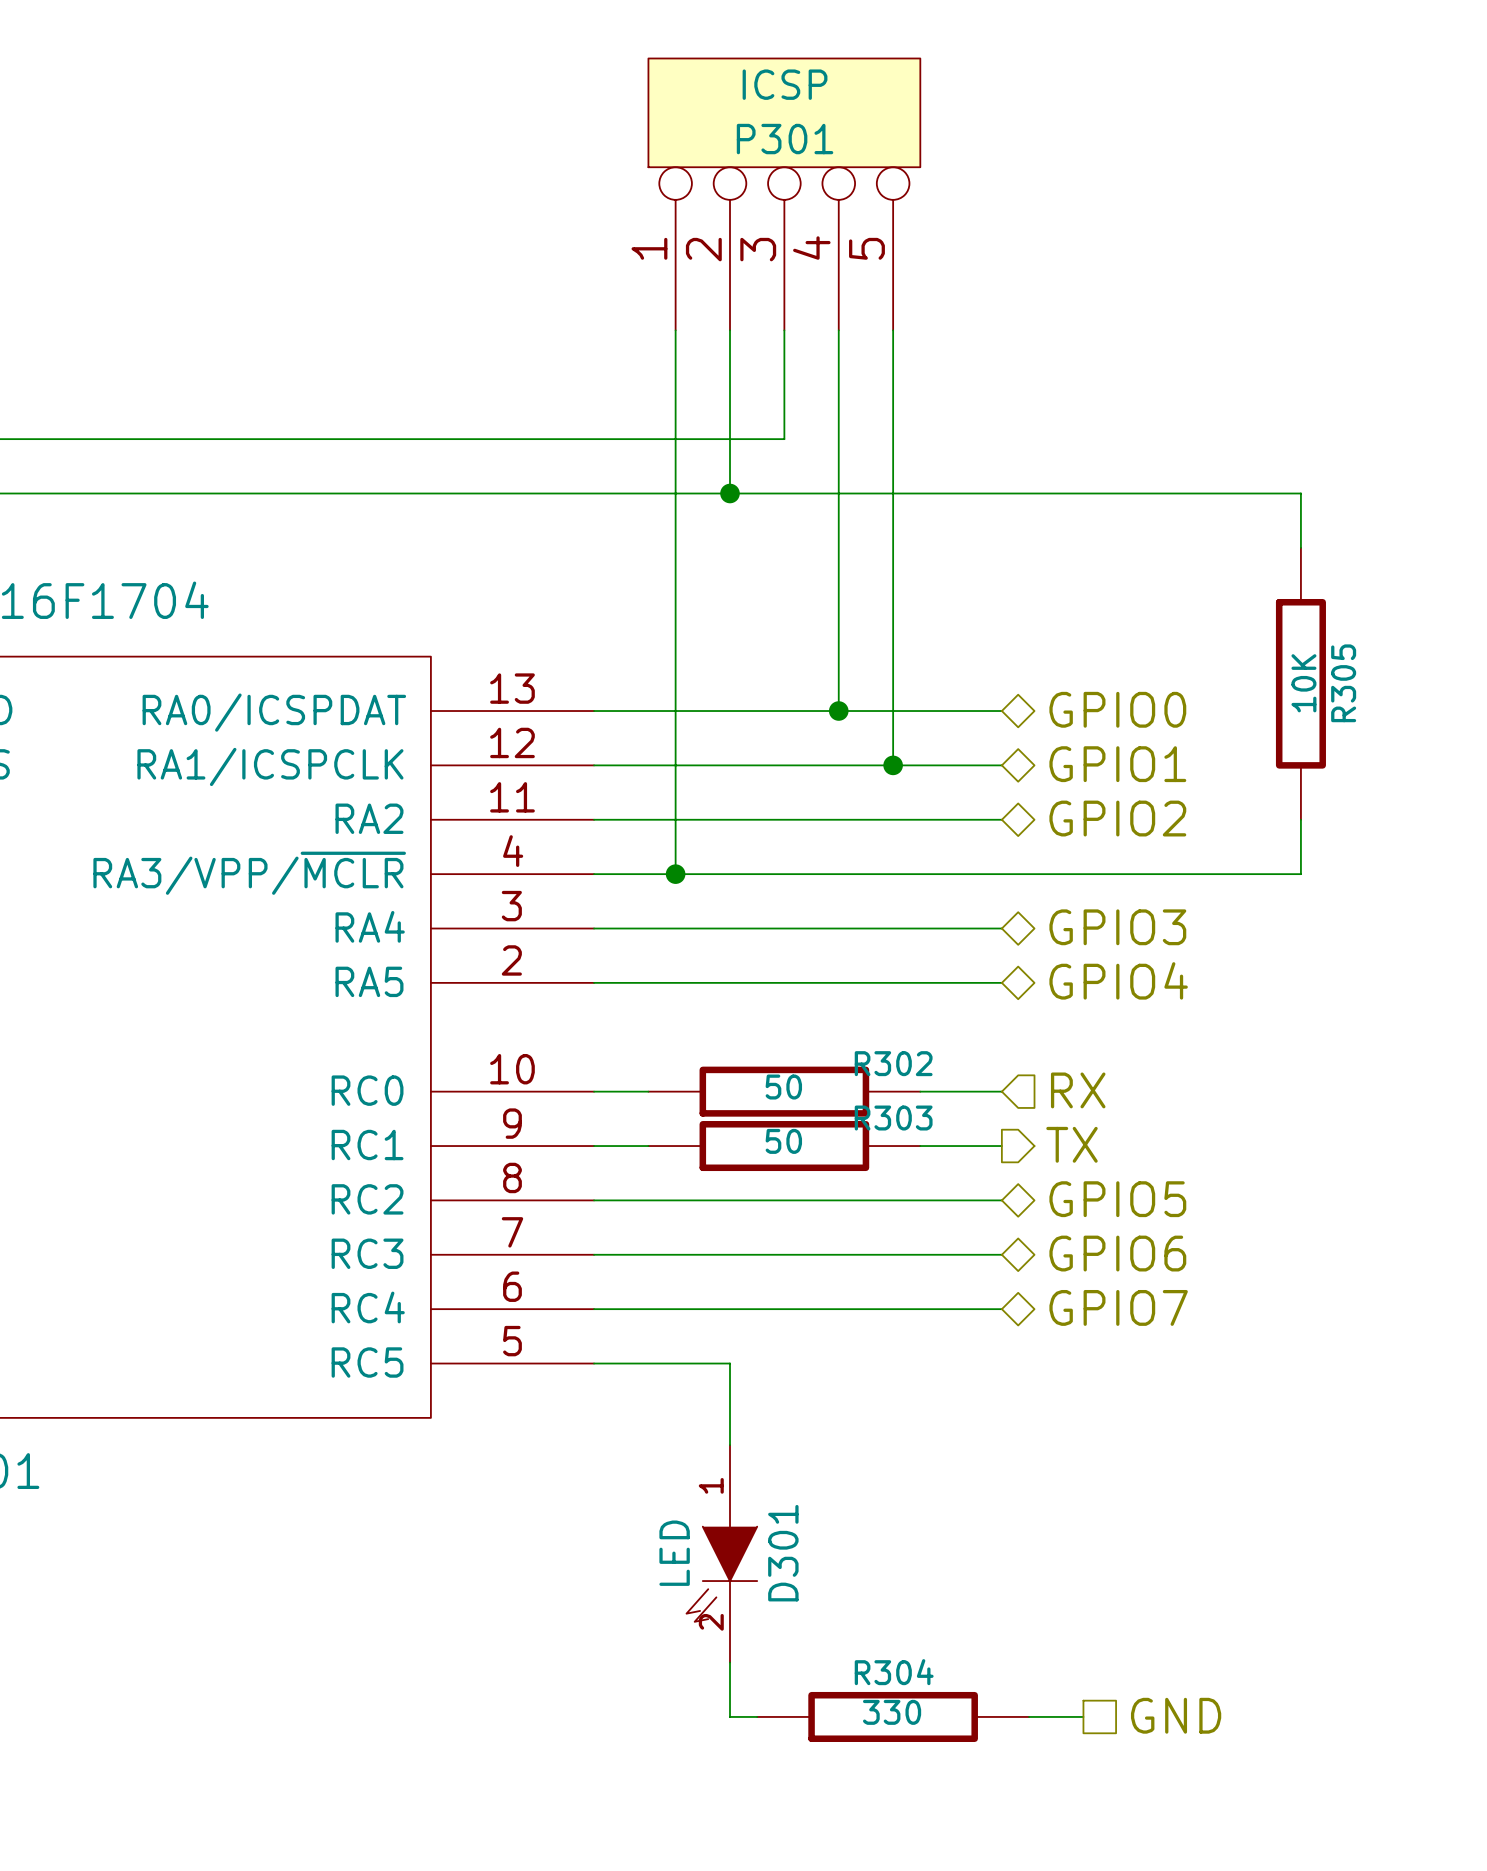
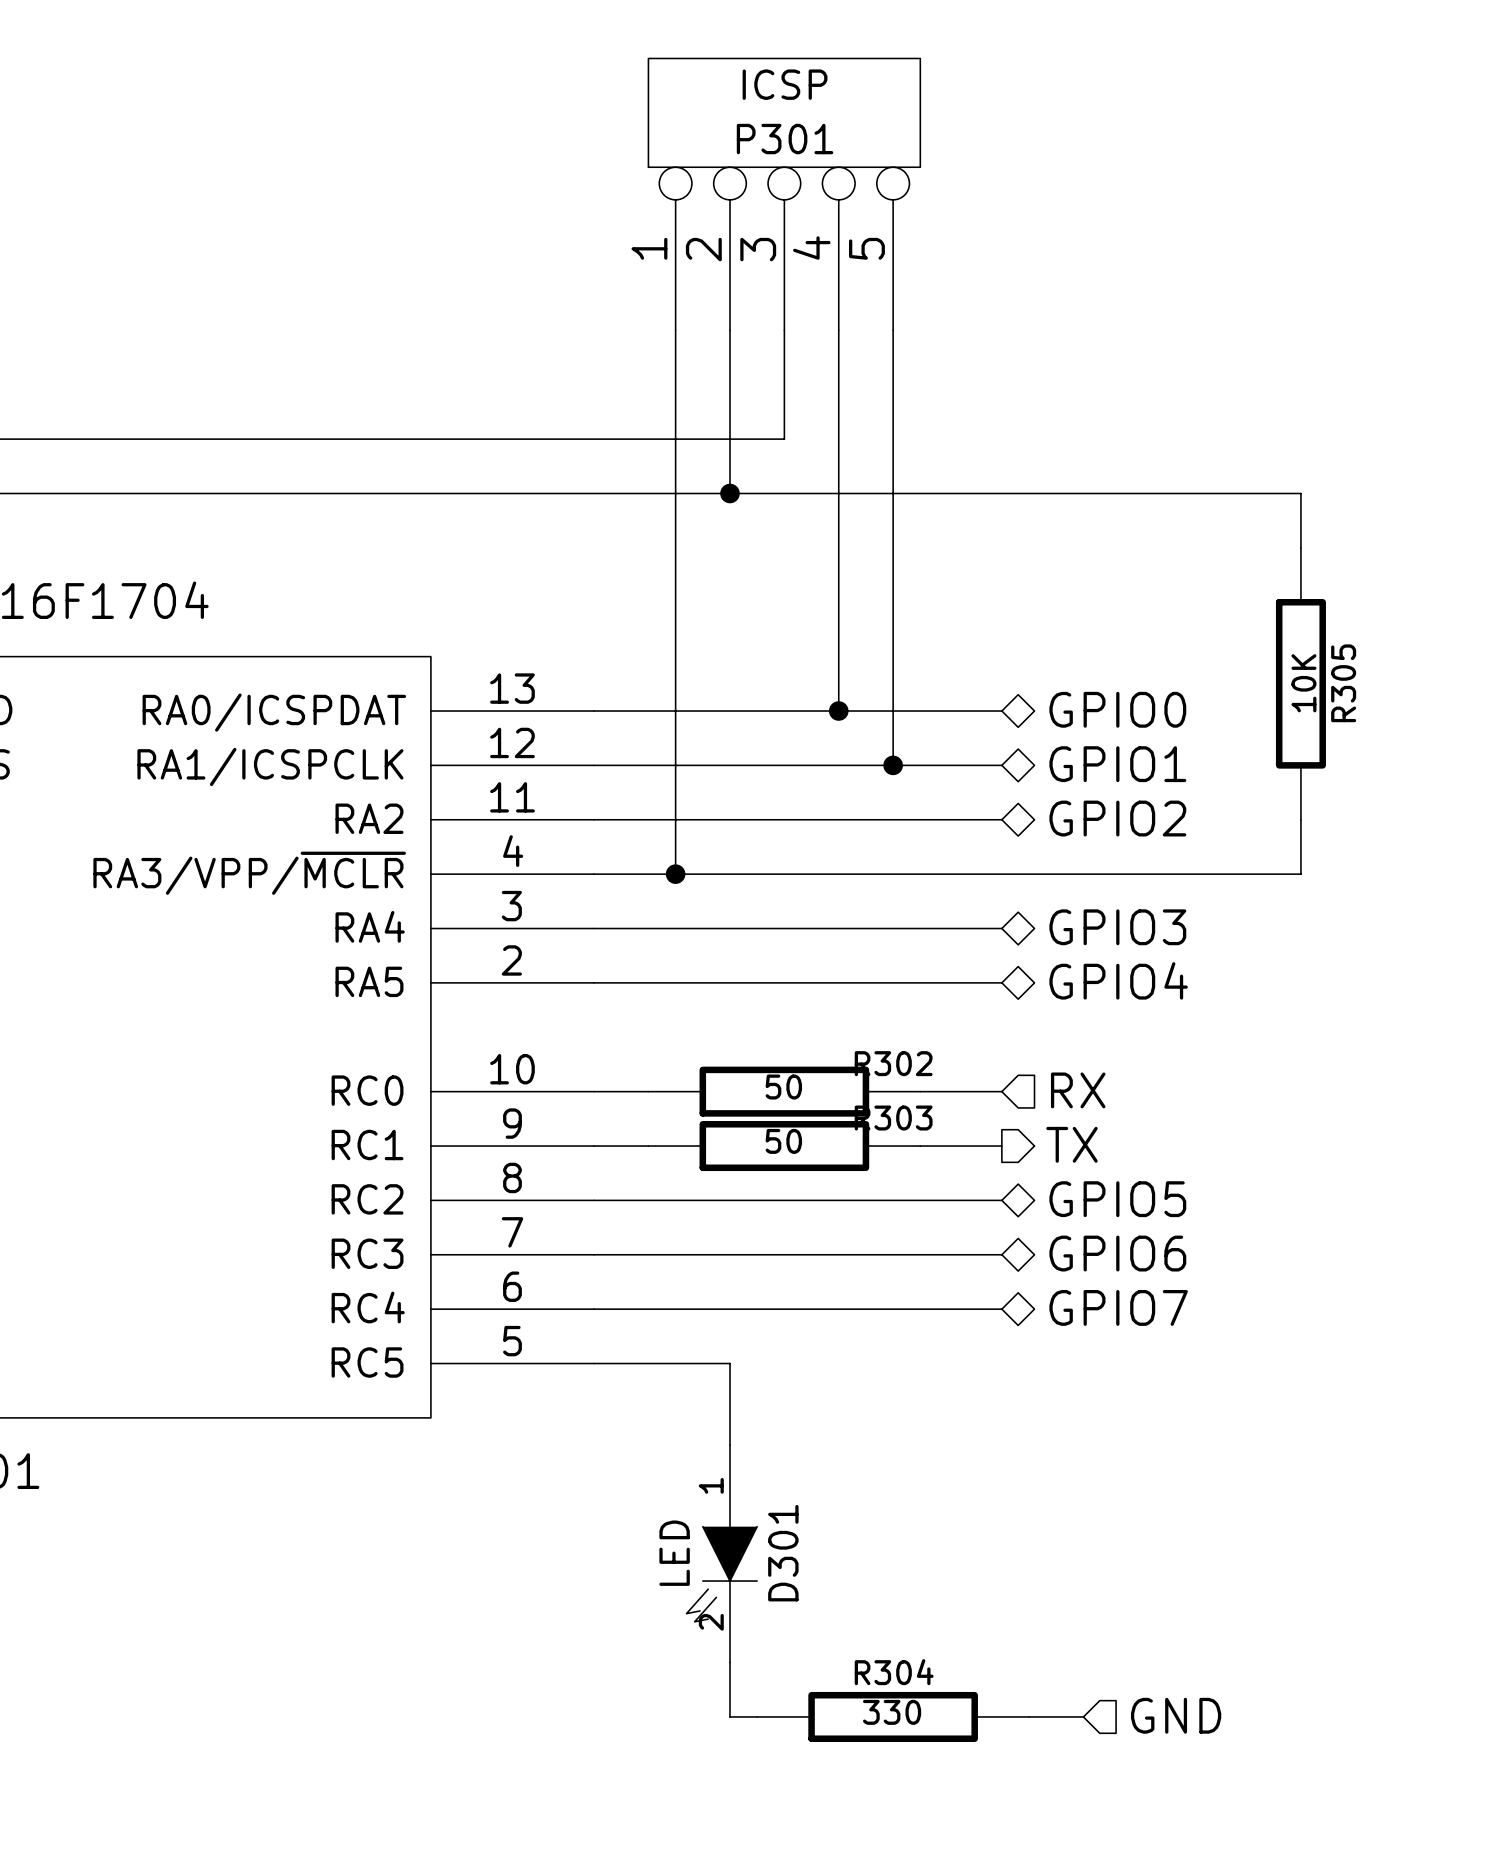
hierarchical label shape: passive (1176, 1715) -> input (1176, 1715)

